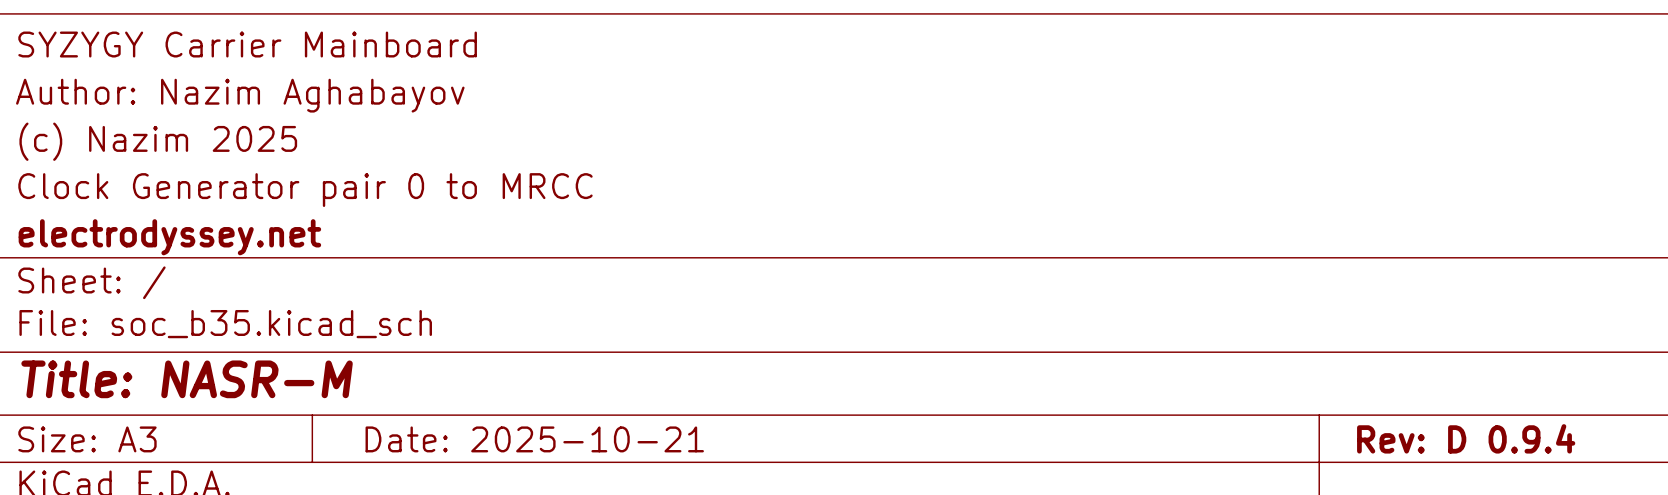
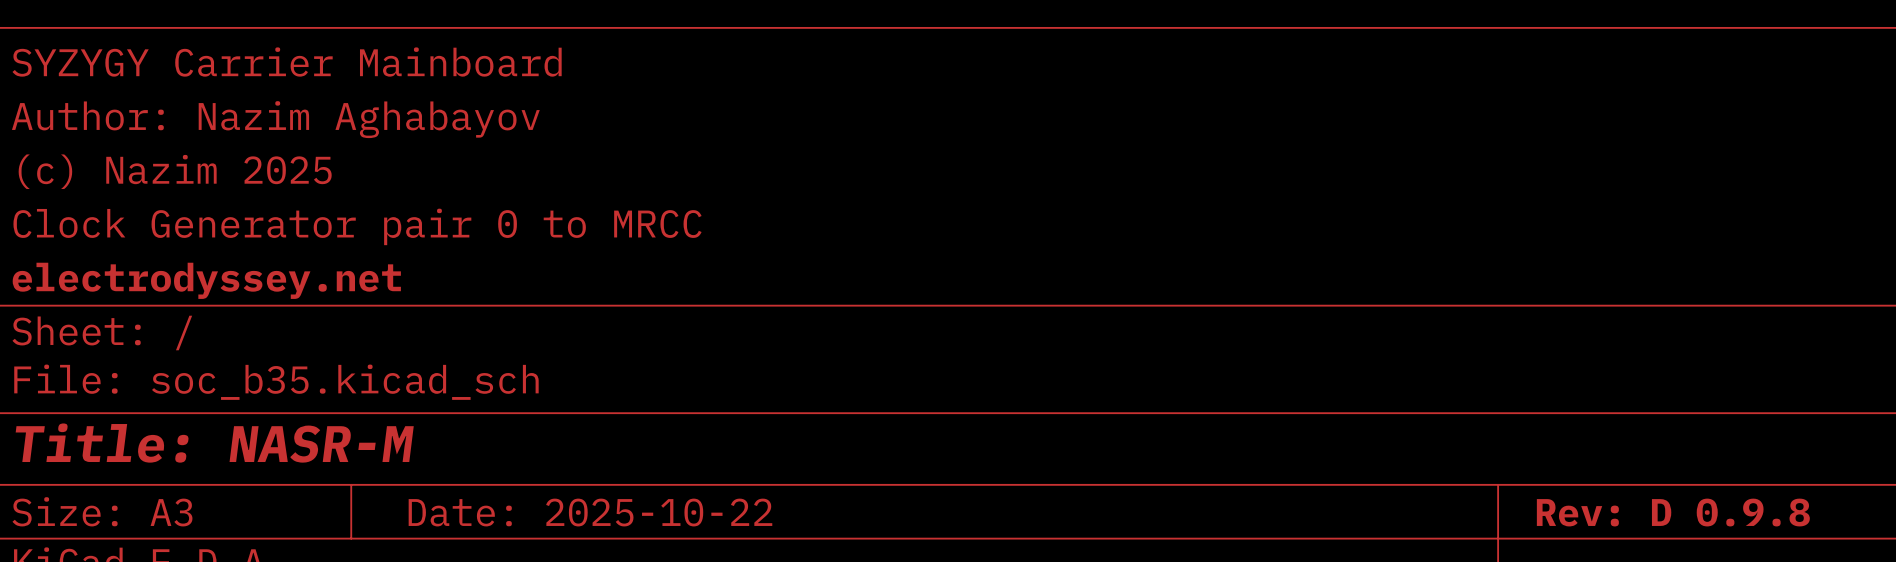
title block: Rev: D 0.9.4 (1466, 438) -> Rev: D 0.9.8 (1673, 512)
title block: Date: 2025-10-21 (534, 439) -> Date: 2025-10-22 (590, 512)

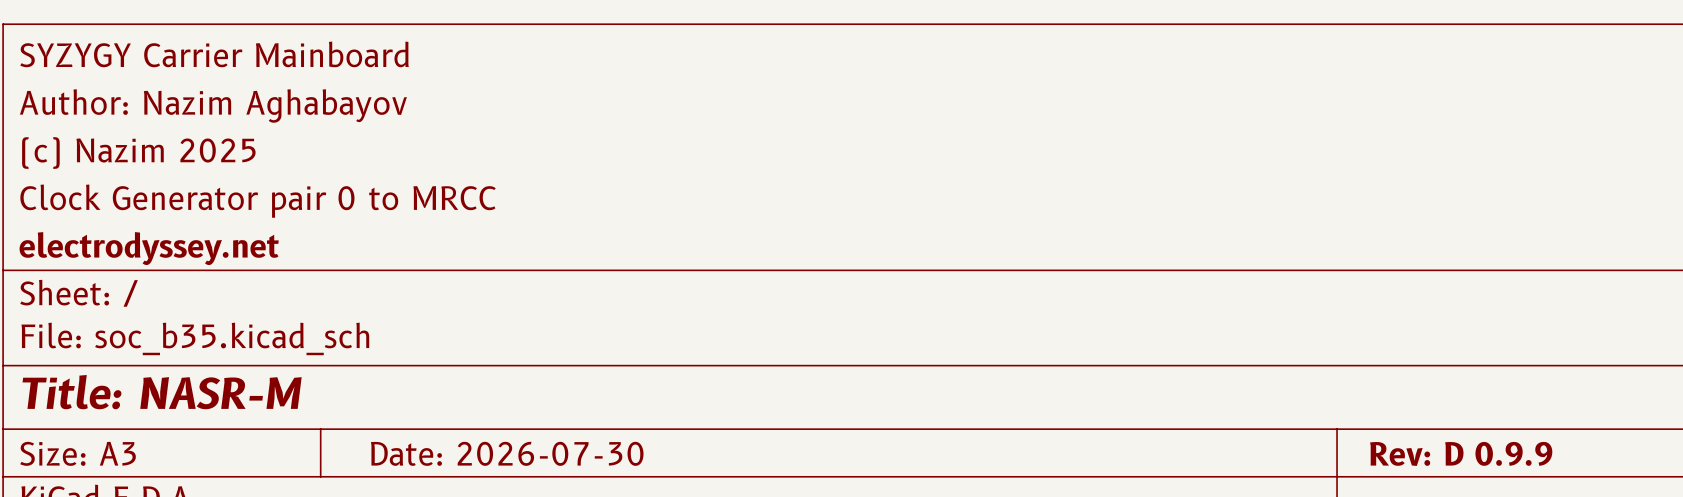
title block: Date: 2025-10-22 (590, 512) -> Date: 2026-07-30 (507, 453)
title block: Rev: D 0.9.8 (1673, 512) -> Rev: D 0.9.9 (1461, 453)

